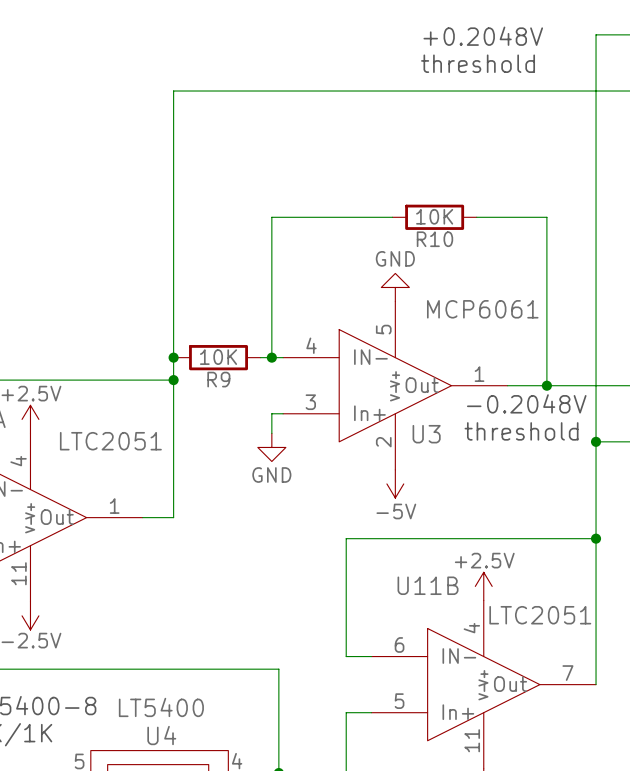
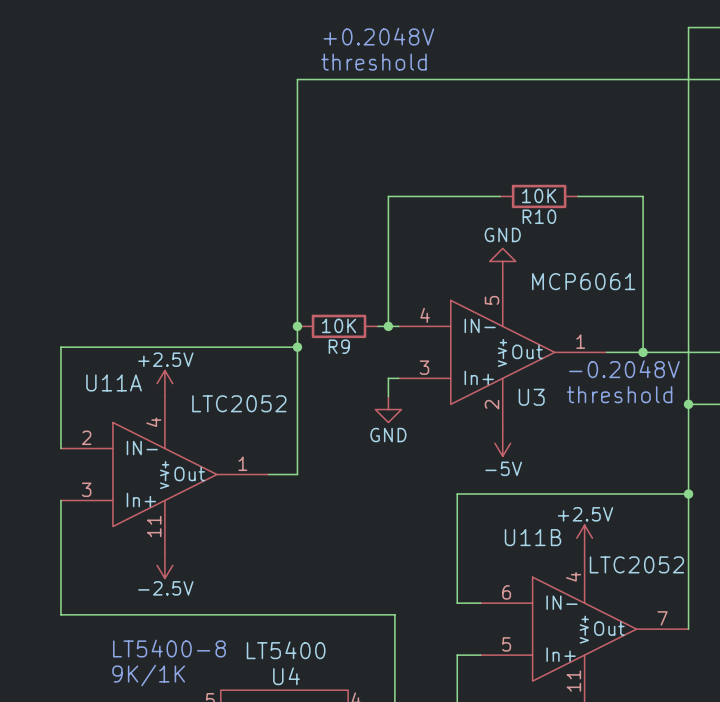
text position: +0.2048V (483, 36) -> +0.2048V (378, 36)
text position: threshold (478, 63) -> threshold (374, 62)
U11A value: LTC2051 (110, 441) -> LTC2052 (239, 403)
U11B value: LTC2051 (540, 615) -> LTC2052 (636, 564)

